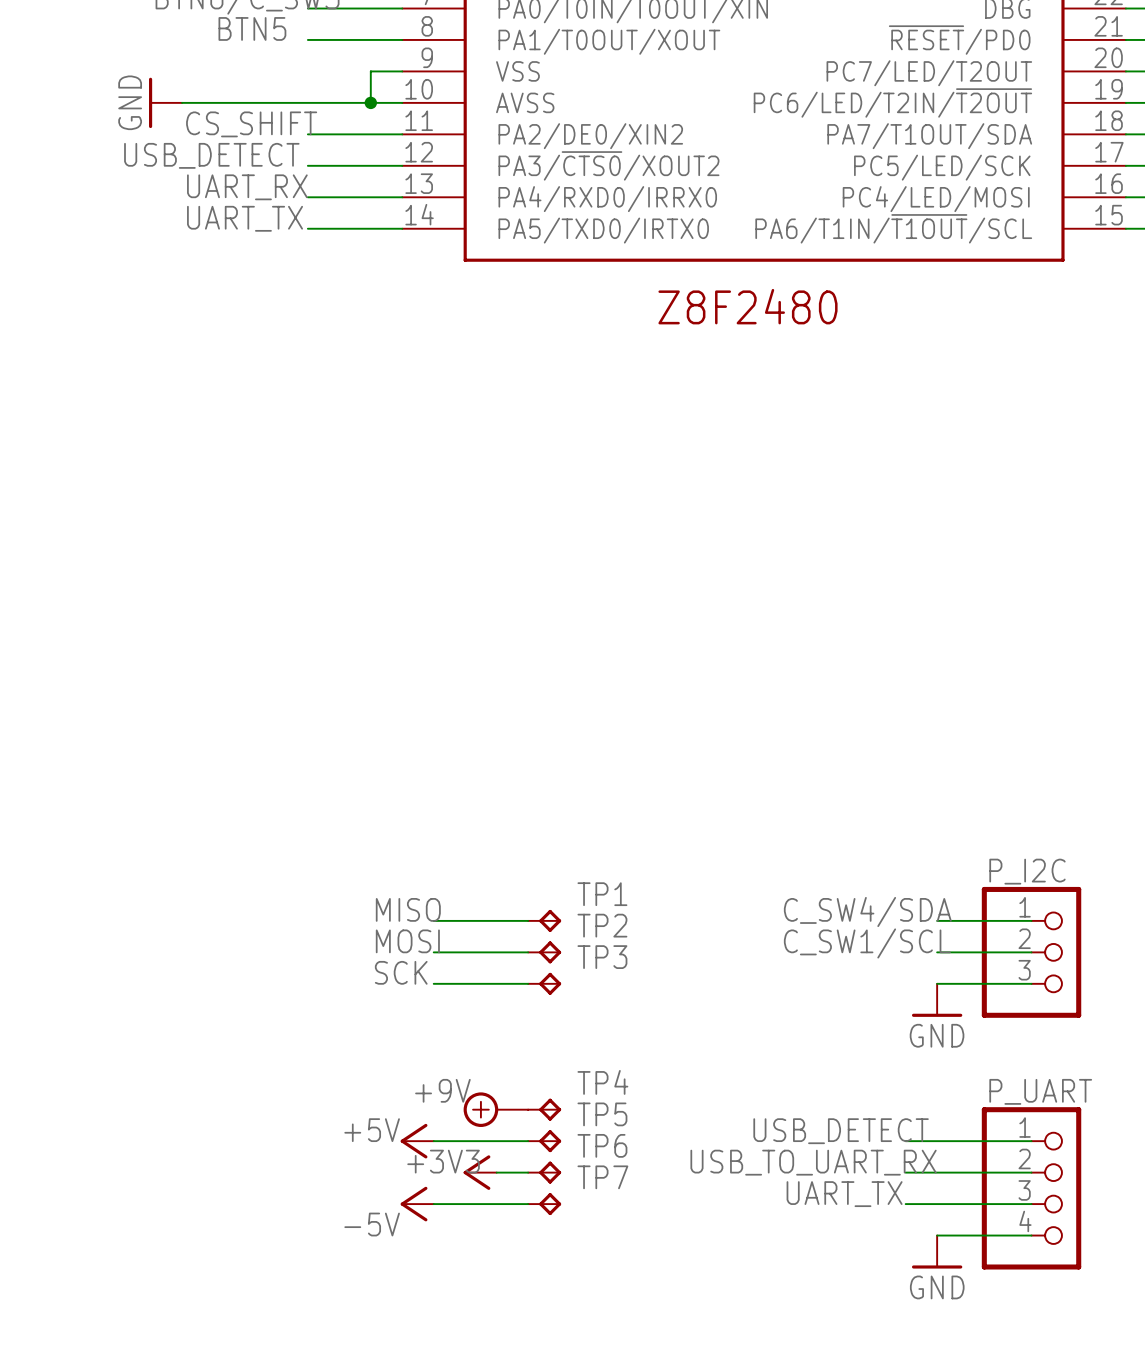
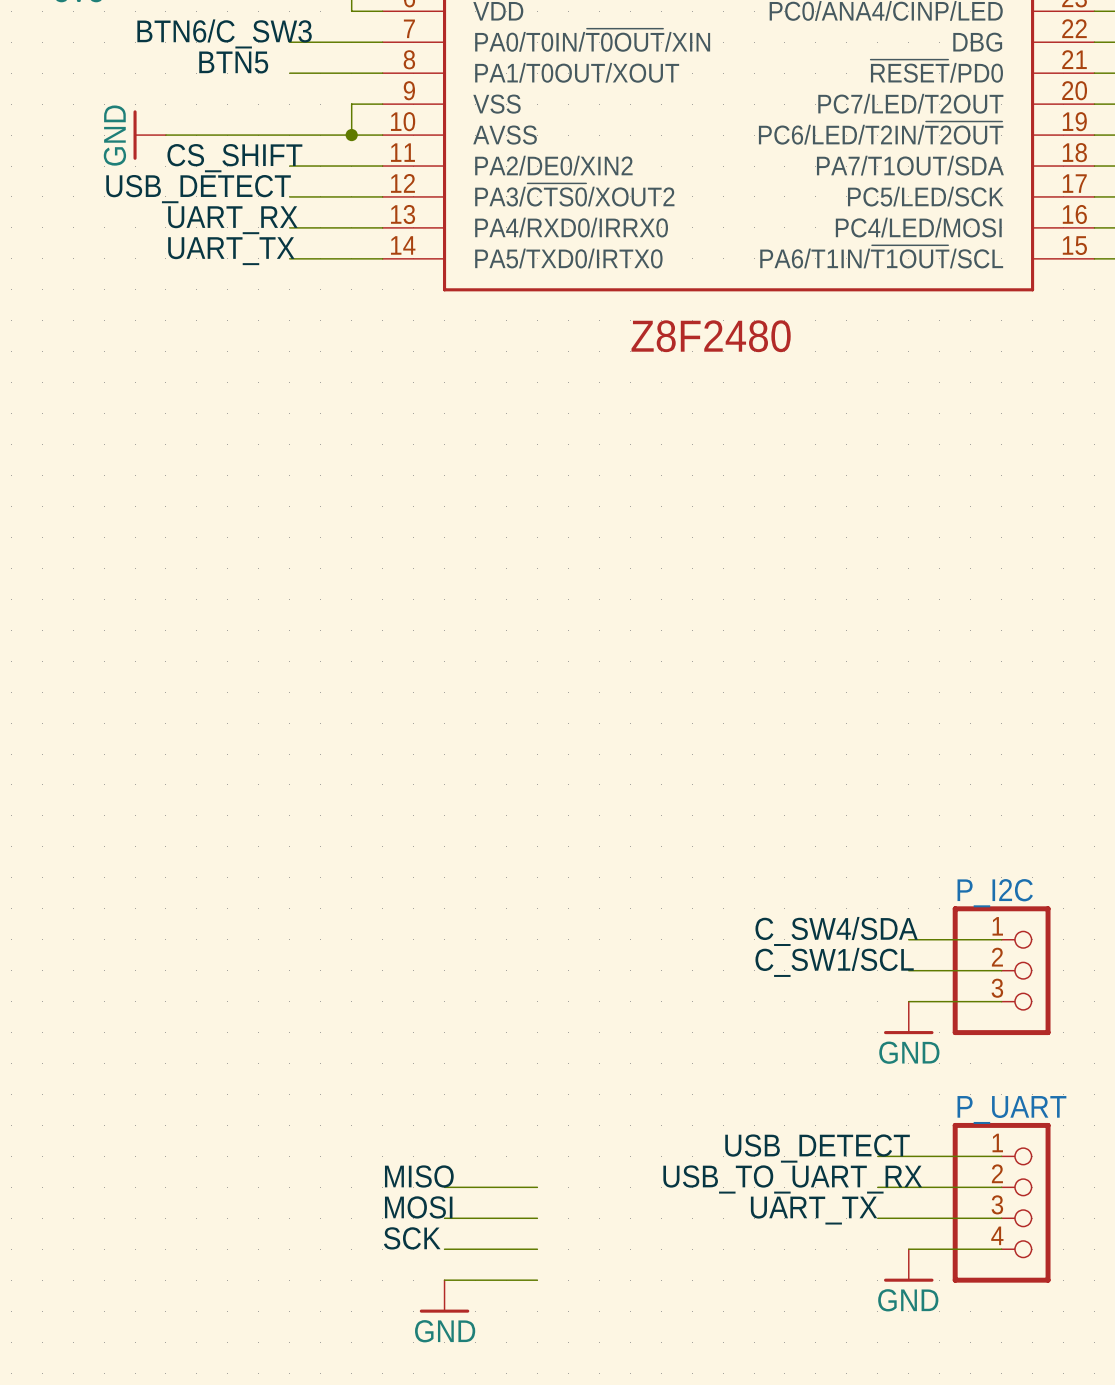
label position: MISO (408, 909) -> MISO (419, 1176)
wire: (433, 920) (528, 920) -> none
TP1: (544, 920) -> none
label position: MOSI (407, 941) -> MOSI (418, 1207)
wire: (433, 952) (528, 952) -> (444, 1249) (537, 1249)
TP2: (544, 952) -> none
label position: SCK (401, 972) -> SCK (412, 1238)
wire: (433, 983) (528, 983) -> (444, 1280) (537, 1280)
TP3: (544, 983) -> none
power symbol: +9V (495, 1109) -> none
TP4: (544, 1109) -> none
power symbol: +5V (417, 1141) -> none
wire: (433, 1141) (528, 1141) -> none
TP5: (544, 1141) -> none
power symbol: +3V3 (480, 1172) -> none
TP6: (544, 1172) -> none
power symbol: -5V (417, 1204) -> none
TP7: (544, 1204) -> none
power symbol: none -> GND (444, 1296)

